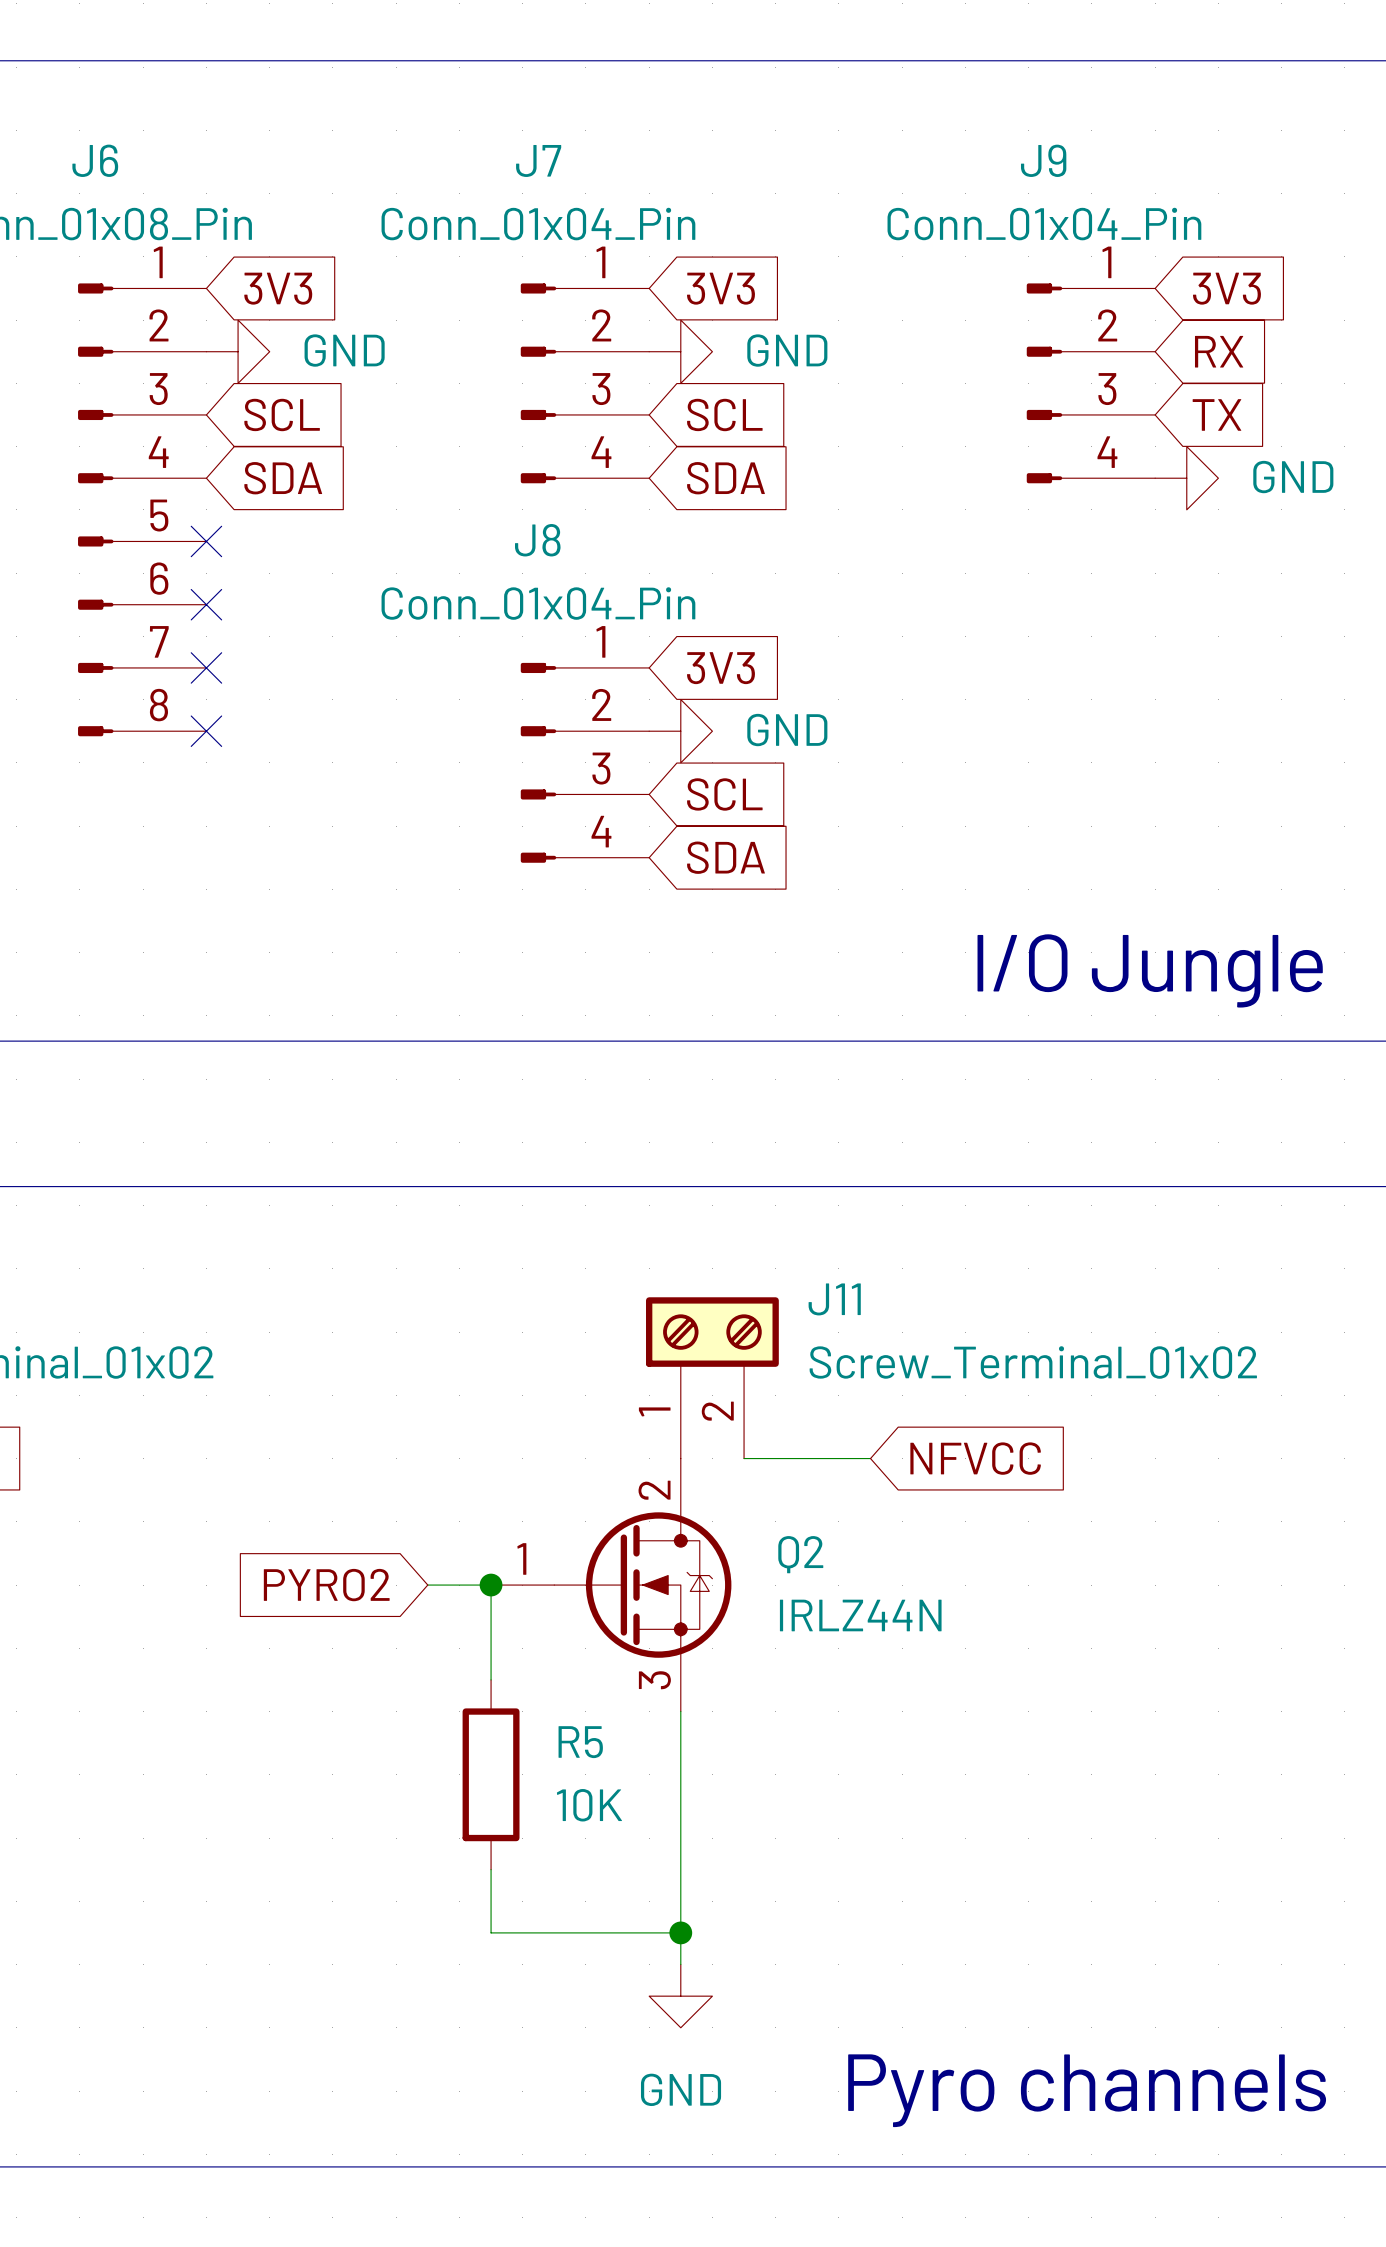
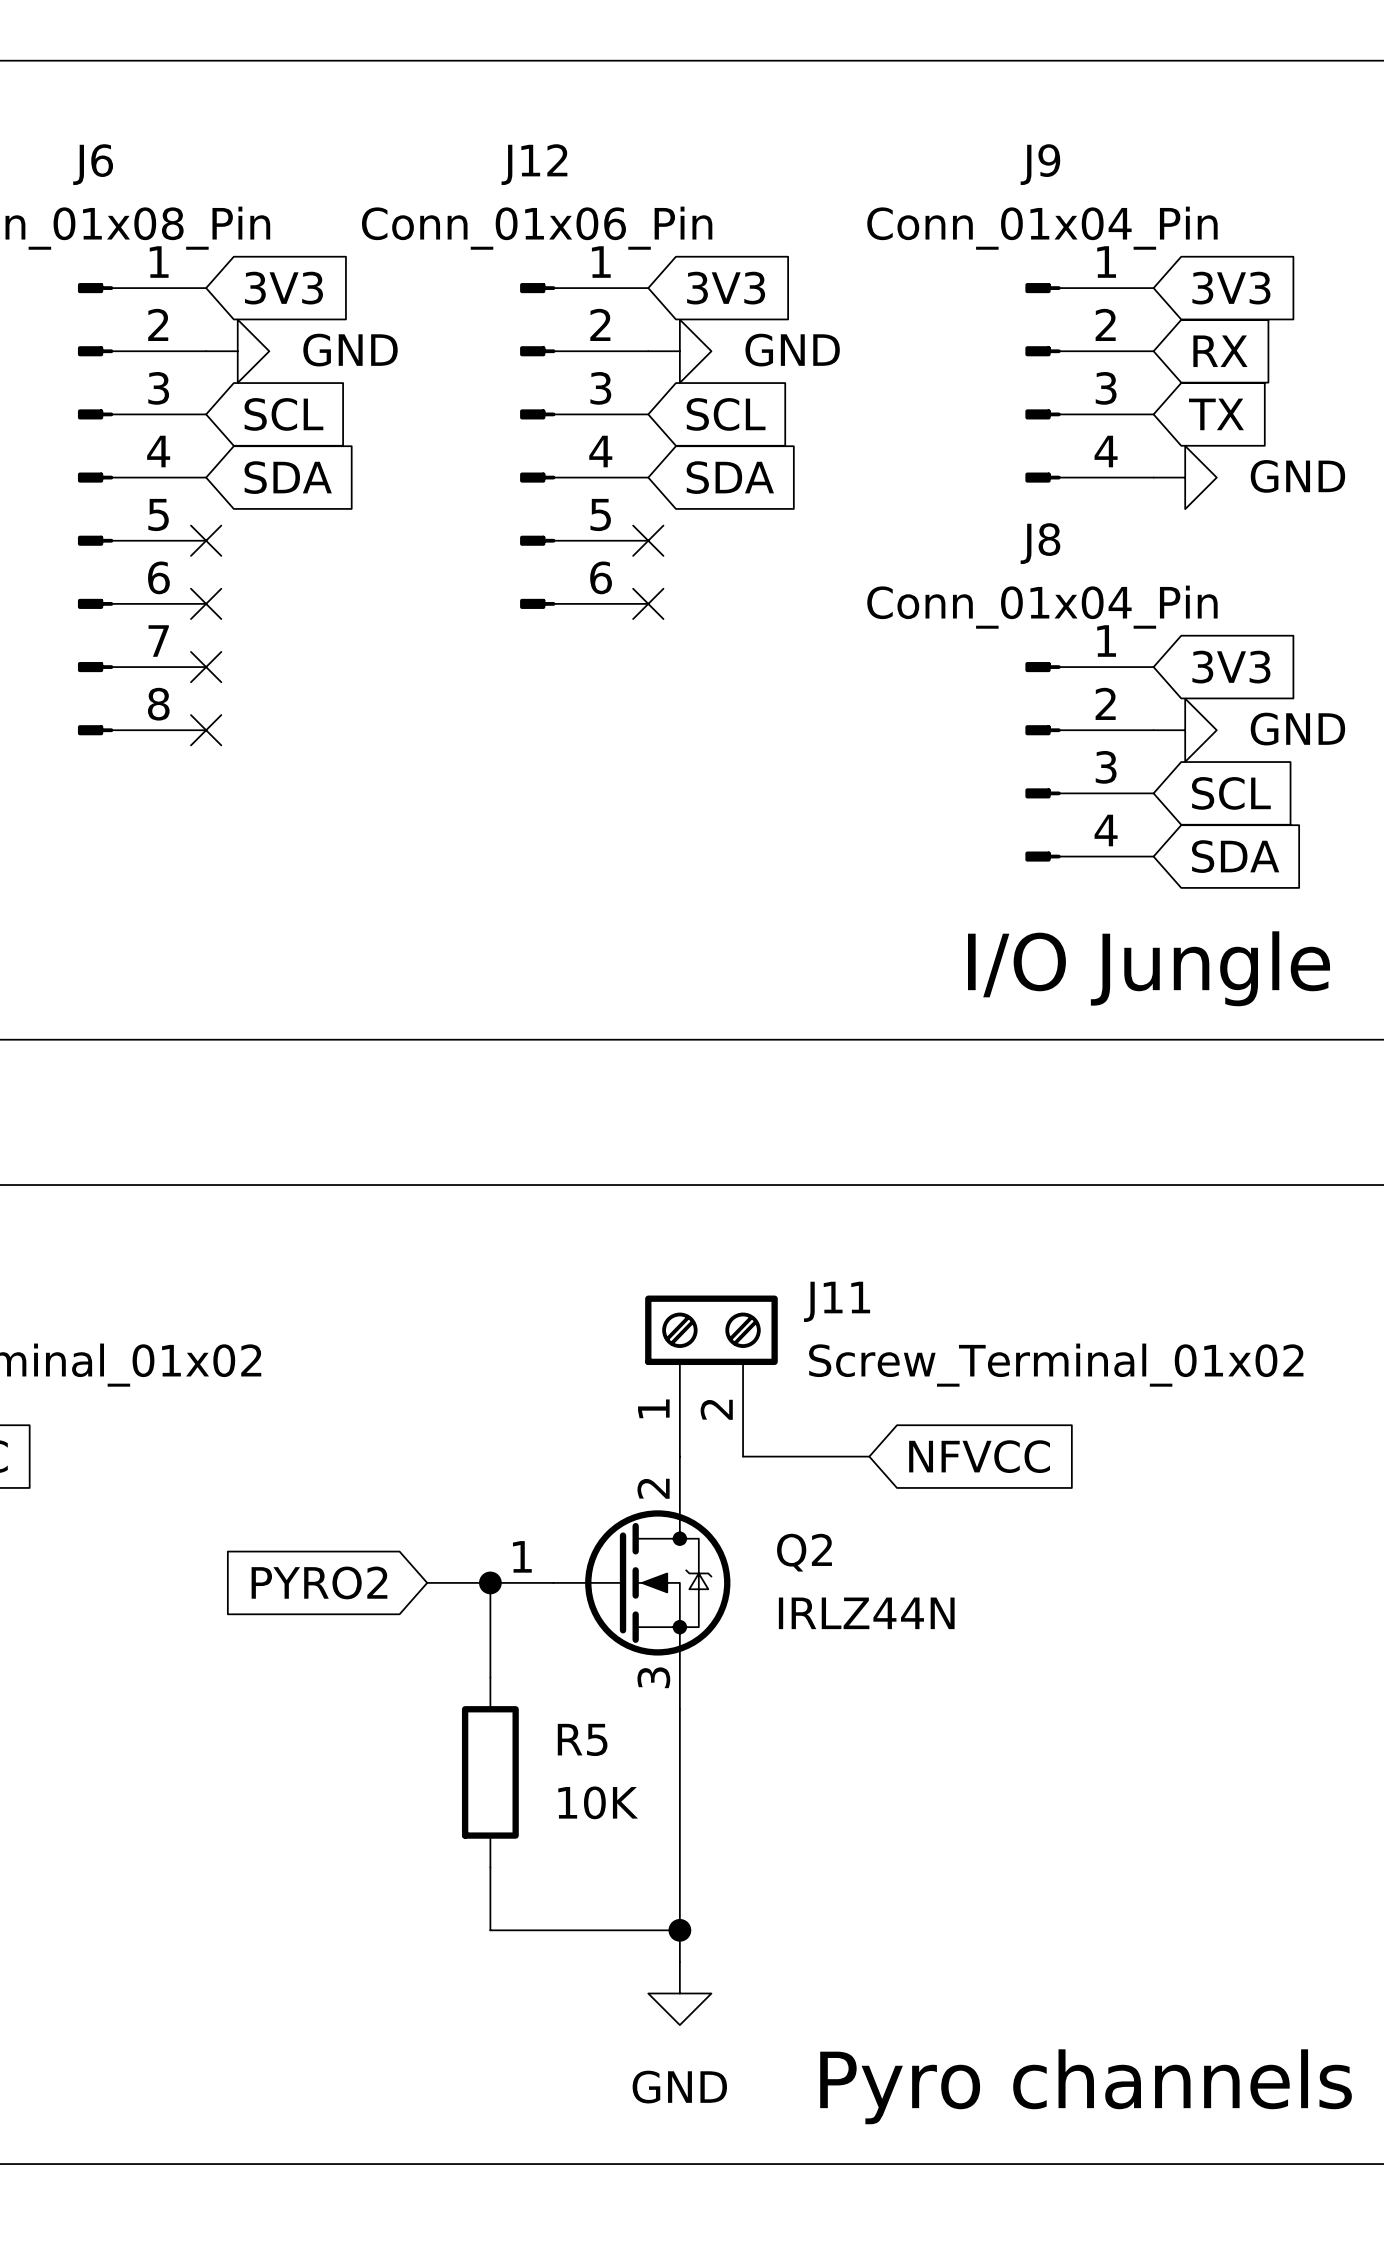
J7: Conn_01x04_Pin (584, 383) -> none
J12: none -> Conn_01x06_Pin (584, 445)
no-connect mark: none -> (648, 540)
no-connect mark: none -> (648, 603)
global label position: 3V3 (720, 668) -> 3V3 (1231, 667)
power symbol position: GND (680, 731) -> GND (1185, 730)
J8 position: (584, 762) -> (1089, 761)
global label position: SCL (724, 794) -> SCL (1231, 793)
global label position: SDA (725, 857) -> SDA (1235, 856)

